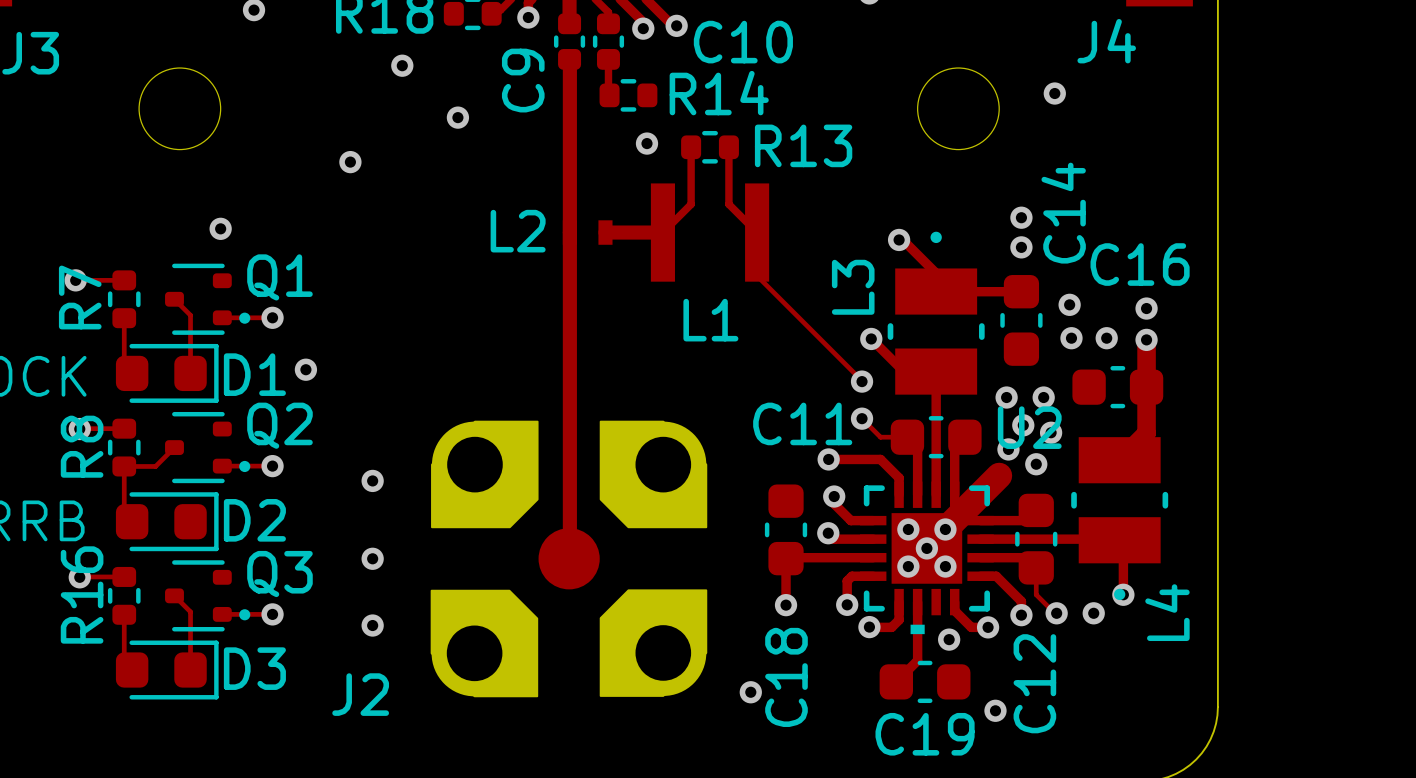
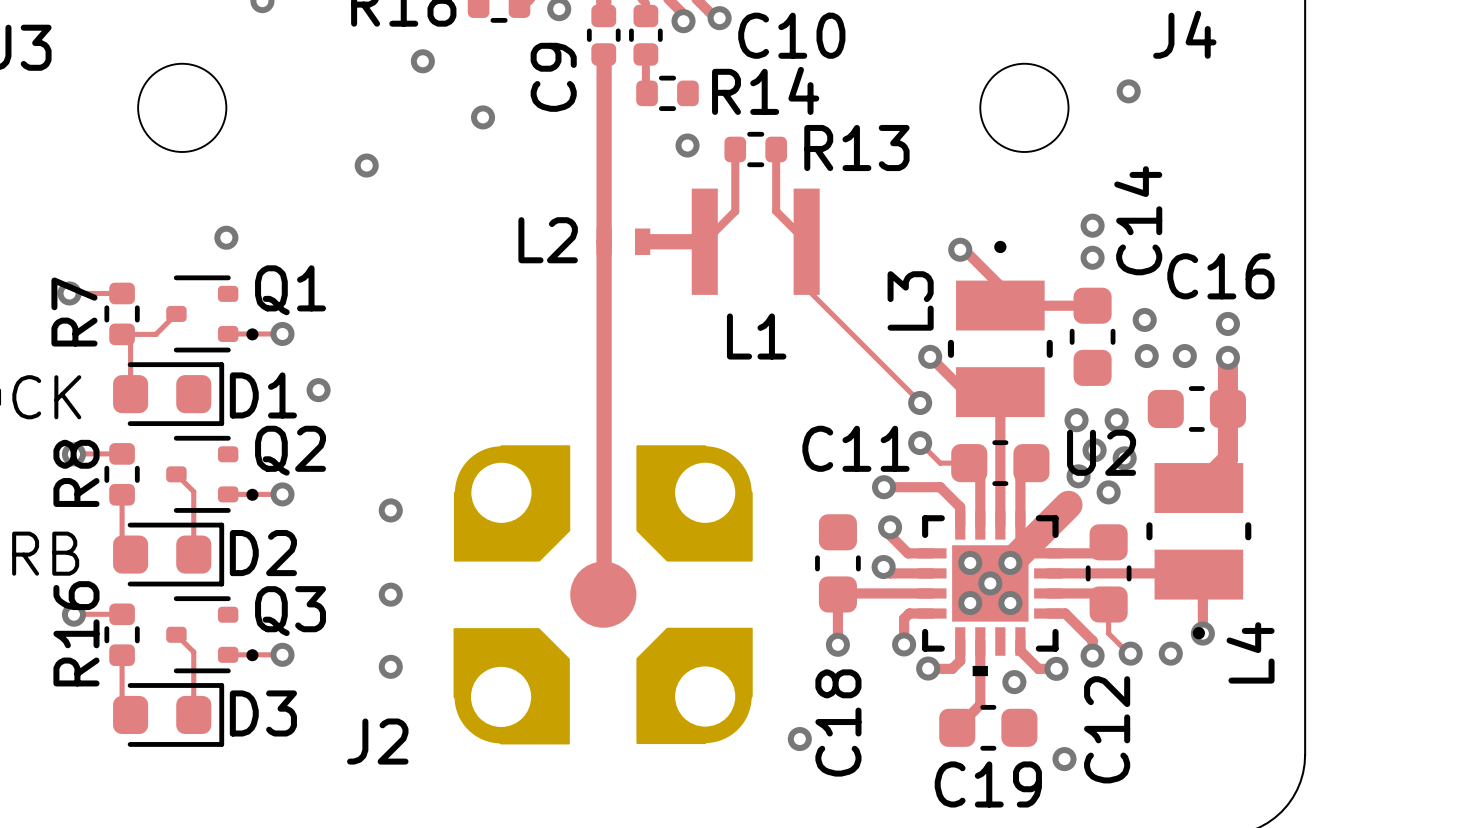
track: (174, 299) (190, 315) (190, 373) -> none
track: (124, 318) (124, 365) (132, 373) -> (176, 313) (155, 334) (122, 334) (130, 342) (130, 394)
track: (174, 447) (155, 466) (124, 466) -> (176, 474) (193, 491) (193, 554)

